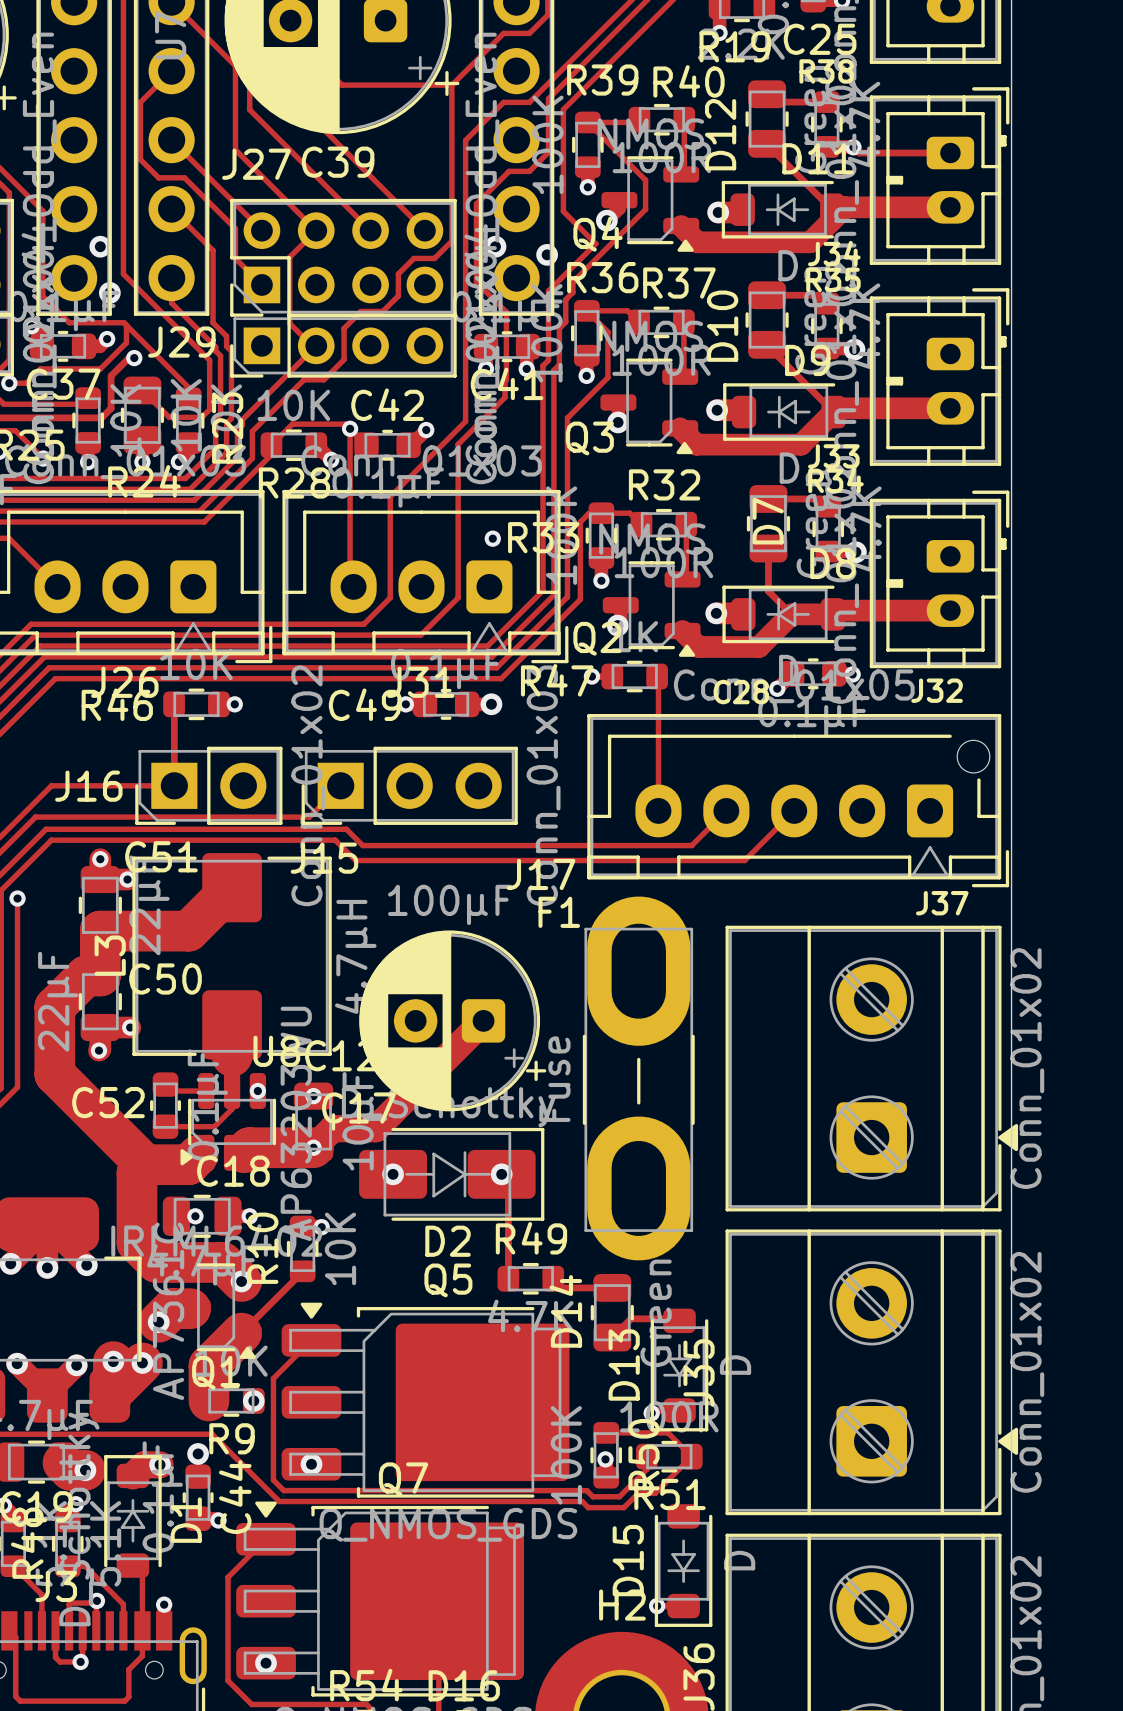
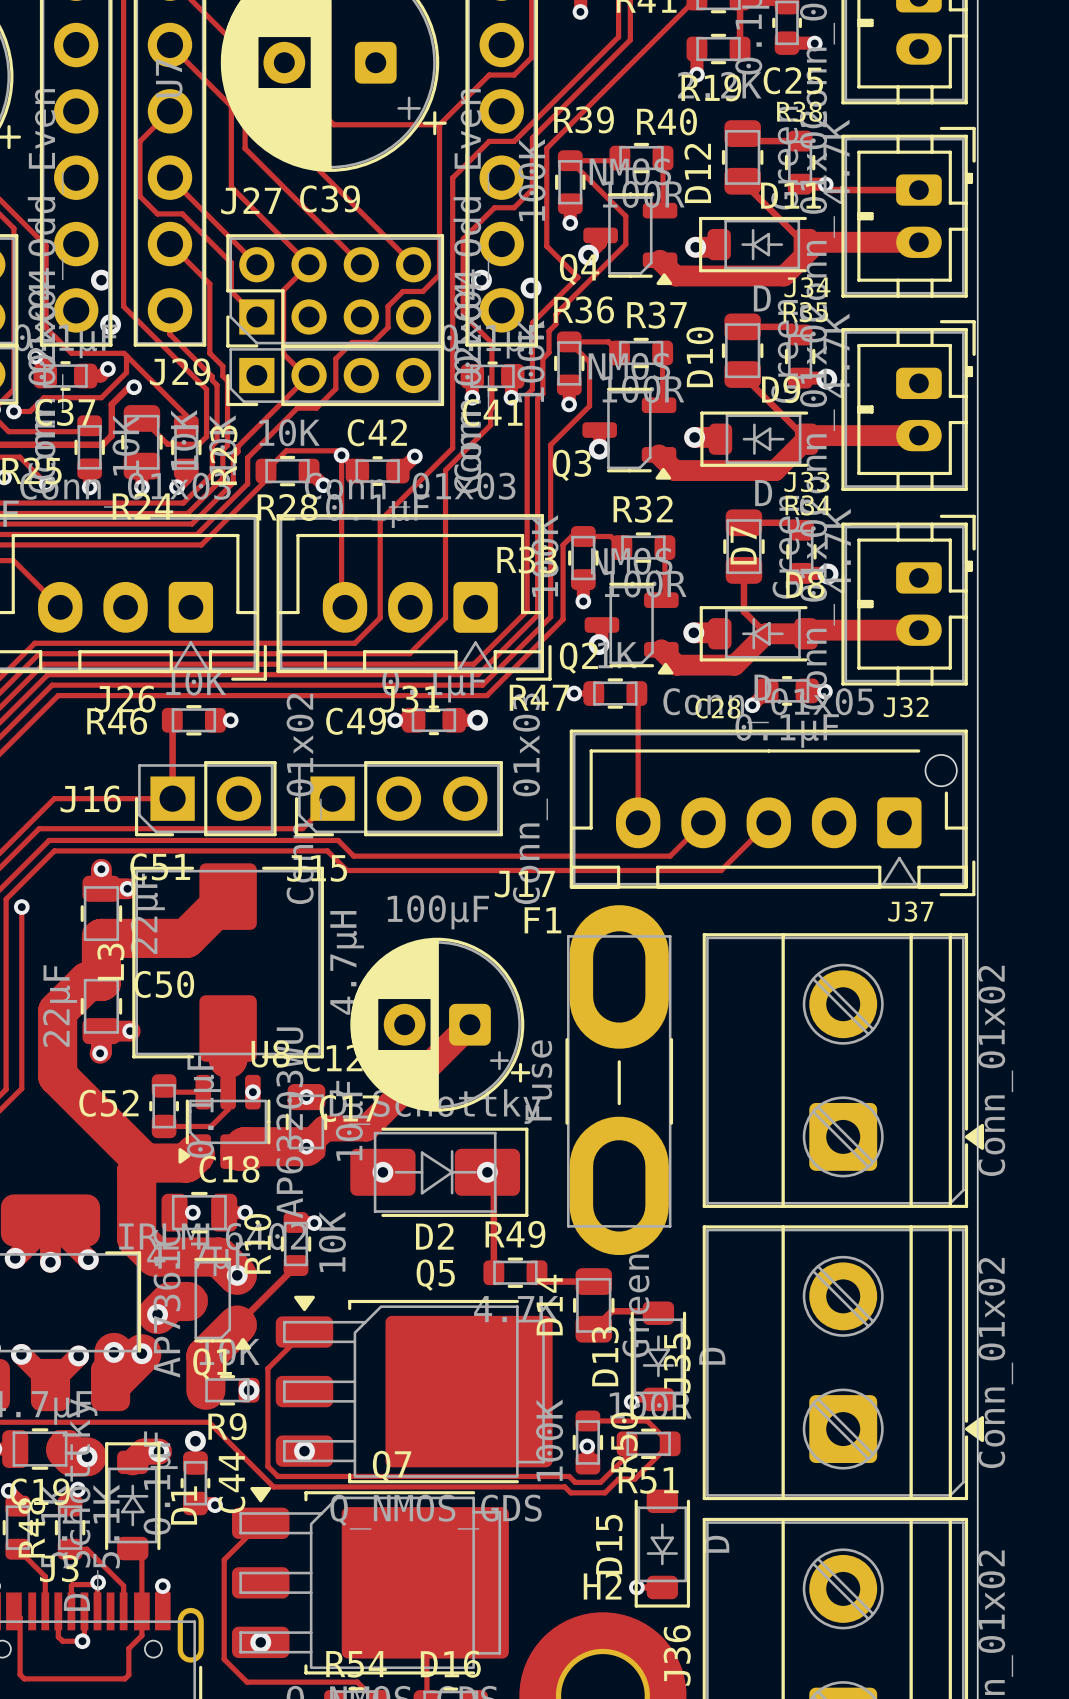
via: (492, 538) -> none

